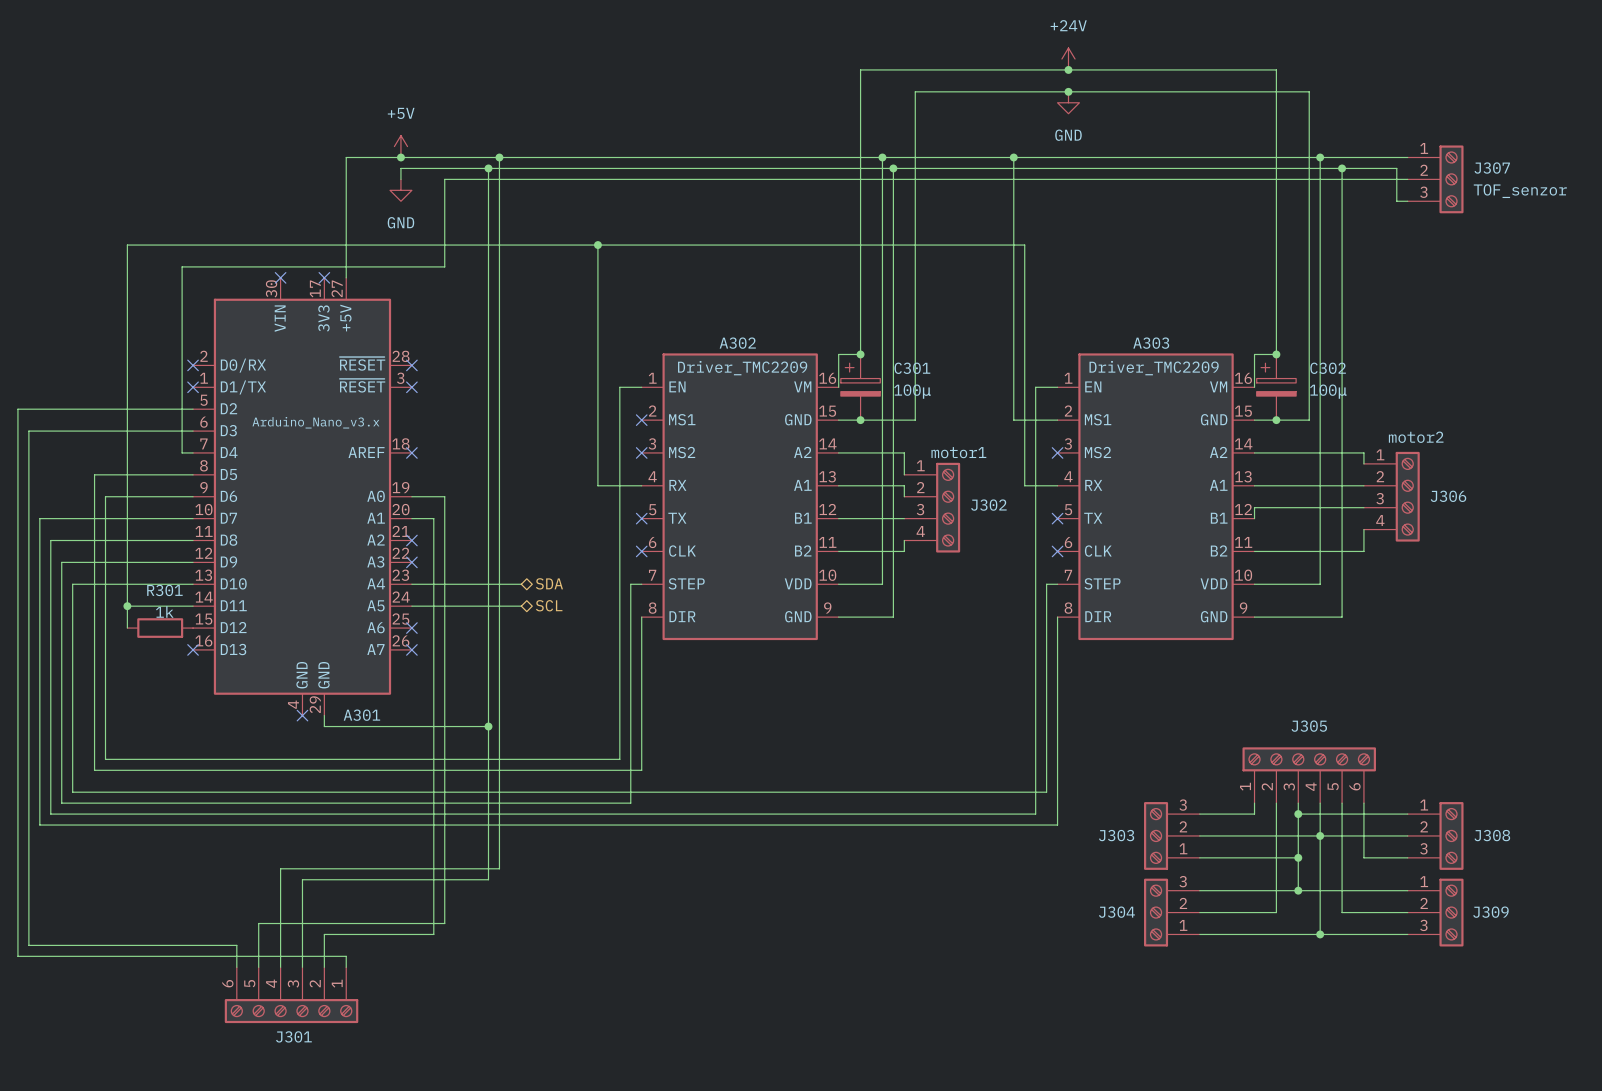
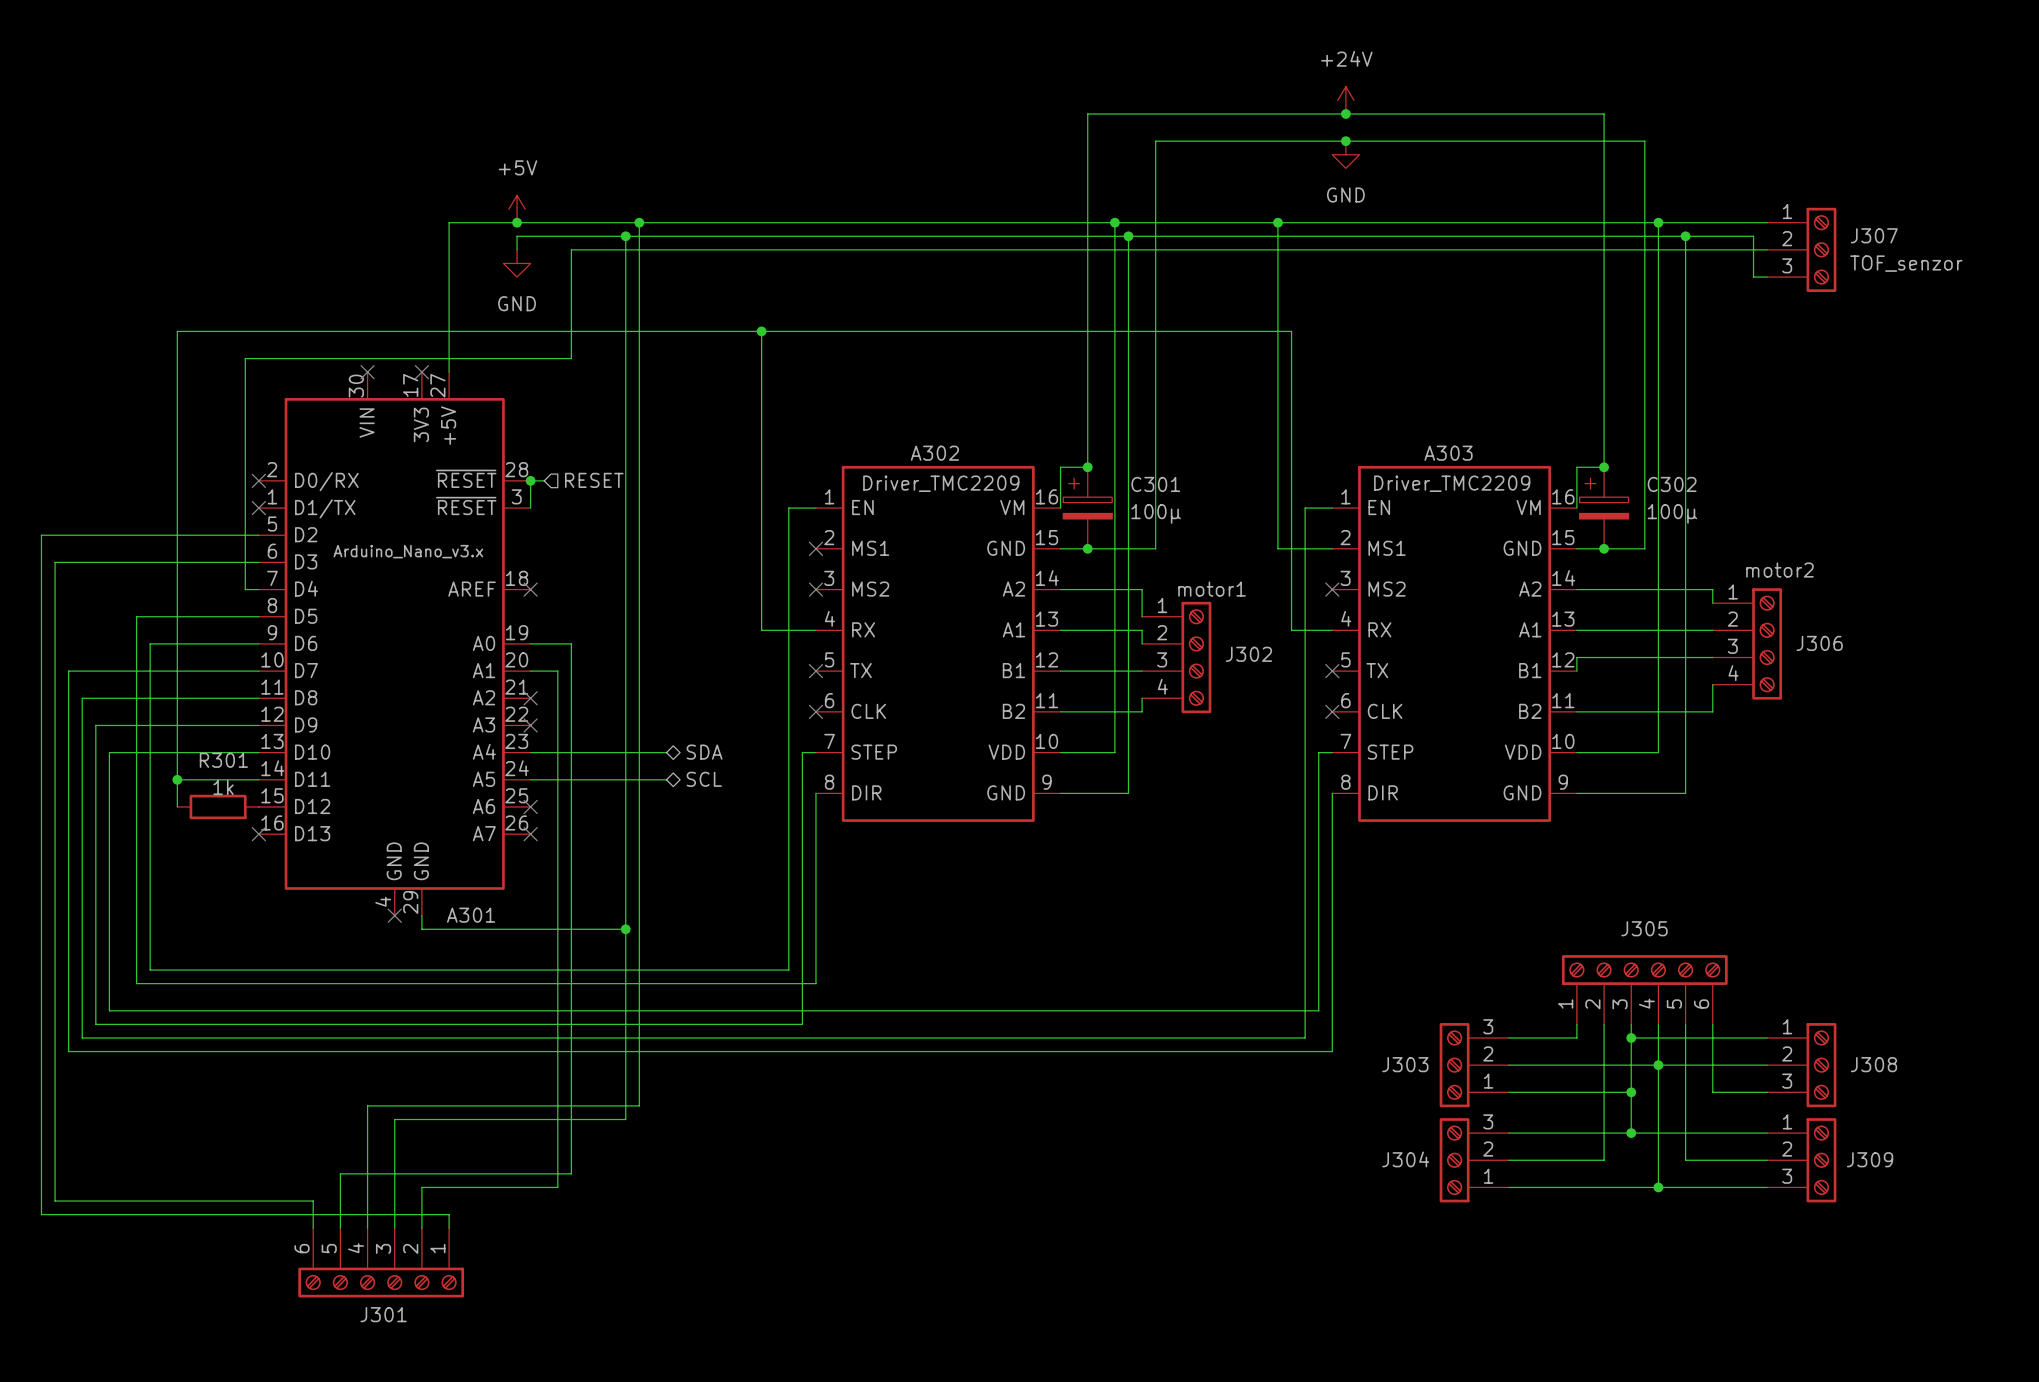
no-connect mark: (411, 365) -> none
junction: none -> (530, 480)
wire: none -> (544, 480) (530, 480) (530, 508)
hierarchical label: none -> RESET (594, 480)
no-connect mark: (411, 387) -> none

